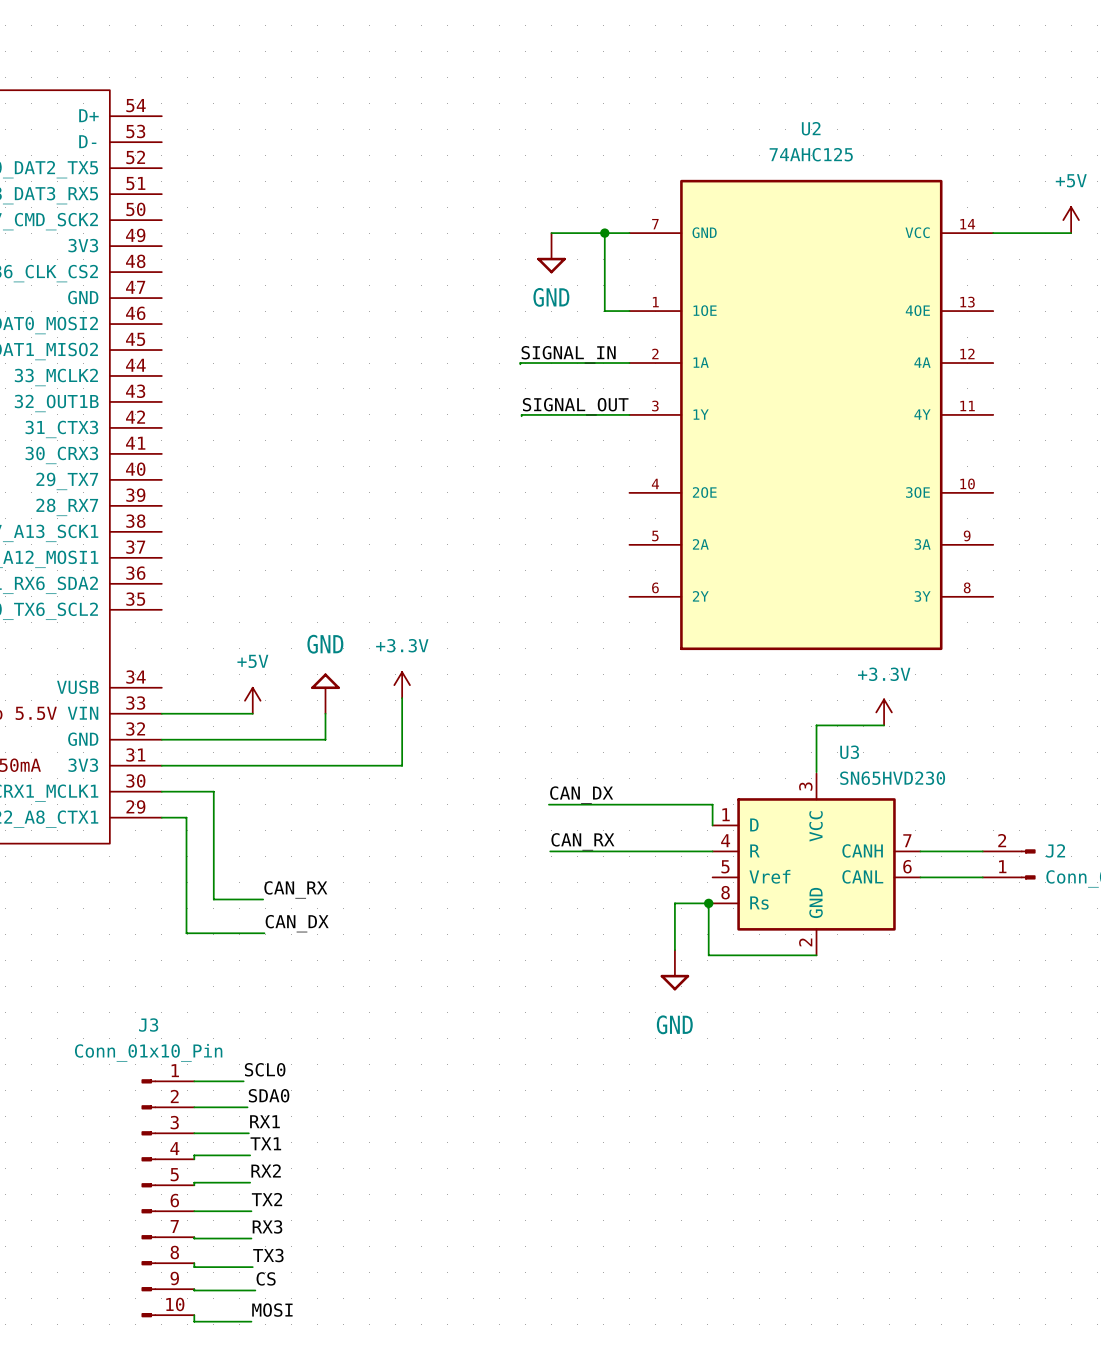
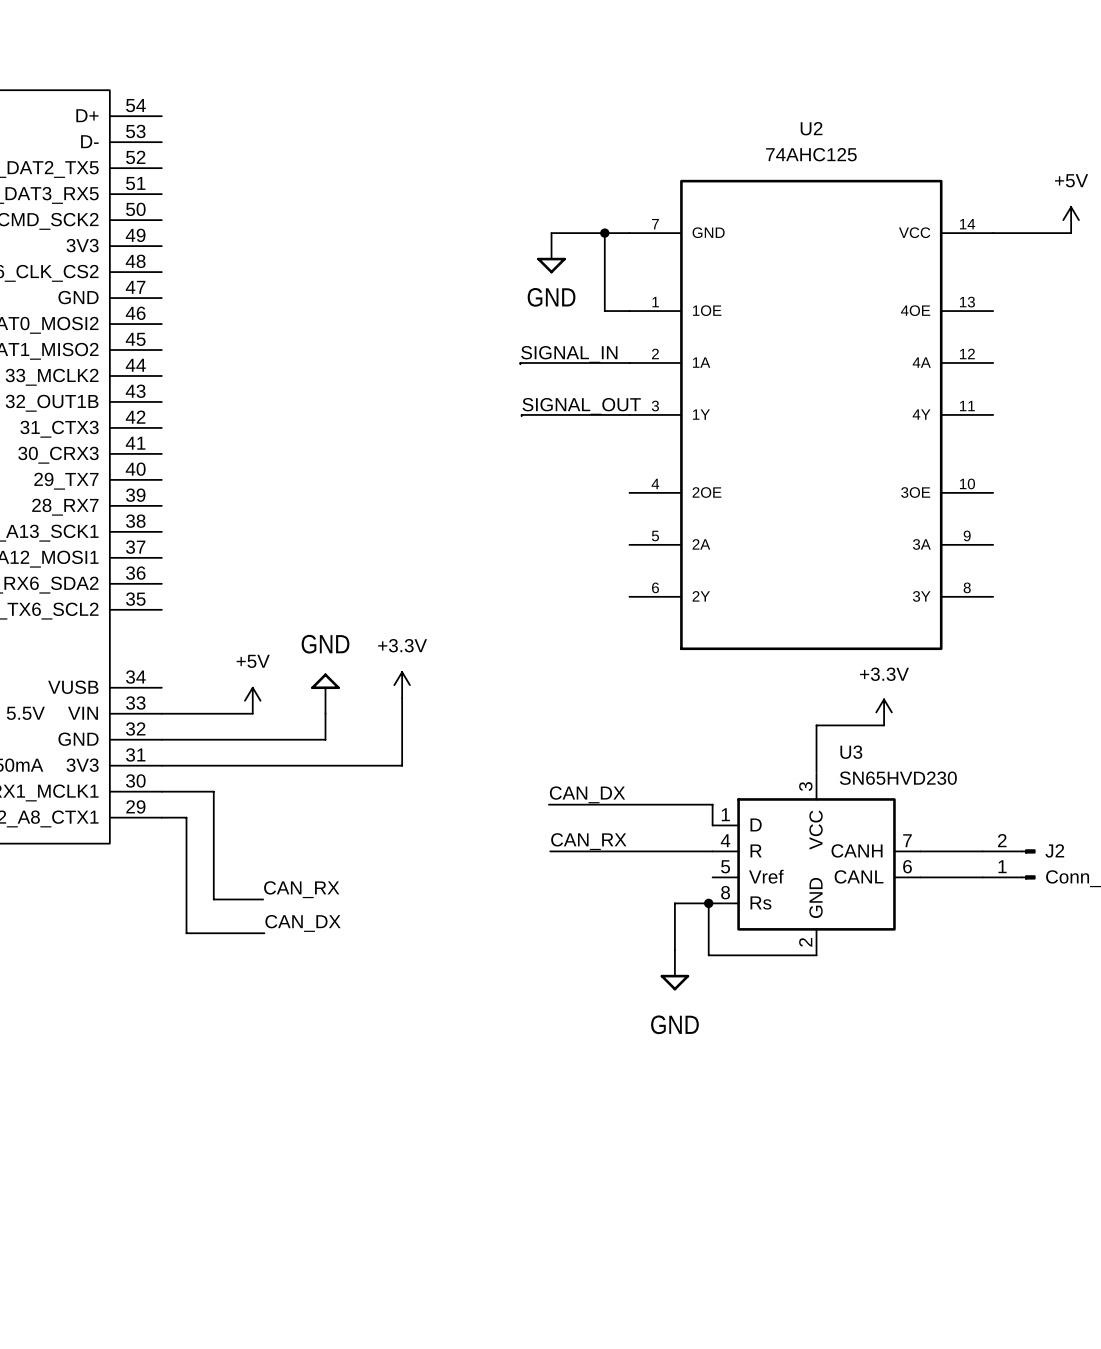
label: SCL0 (265, 1069) -> none
wire: (194, 1081) (243, 1081) -> none
label: SDA0 (269, 1095) -> none
wire: (194, 1107) (247, 1107) -> none
label: RX1 (264, 1121) -> none
wire: (194, 1133) (248, 1133) -> none
label: TX1 (265, 1143) -> none
wire: (250, 1155) (194, 1155) (194, 1159) -> none
label: RX2 (266, 1170) -> none
wire: (250, 1182) (194, 1182) (194, 1185) -> none
J3: Conn_01x10_Pin (167, 1198) -> none
label: TX2 (266, 1199) -> none
wire: (194, 1211) (251, 1211) -> none
label: RX3 (267, 1226) -> none
wire: (194, 1237) (251, 1238) -> none
label: TX3 (268, 1255) -> none
wire: (194, 1263) (194, 1267) (252, 1267) -> none
label: CS (266, 1278) -> none
wire: (194, 1289) (255, 1290) -> none
label: MOSI (272, 1310) -> none
wire: (194, 1315) (194, 1321) (251, 1321) -> none

